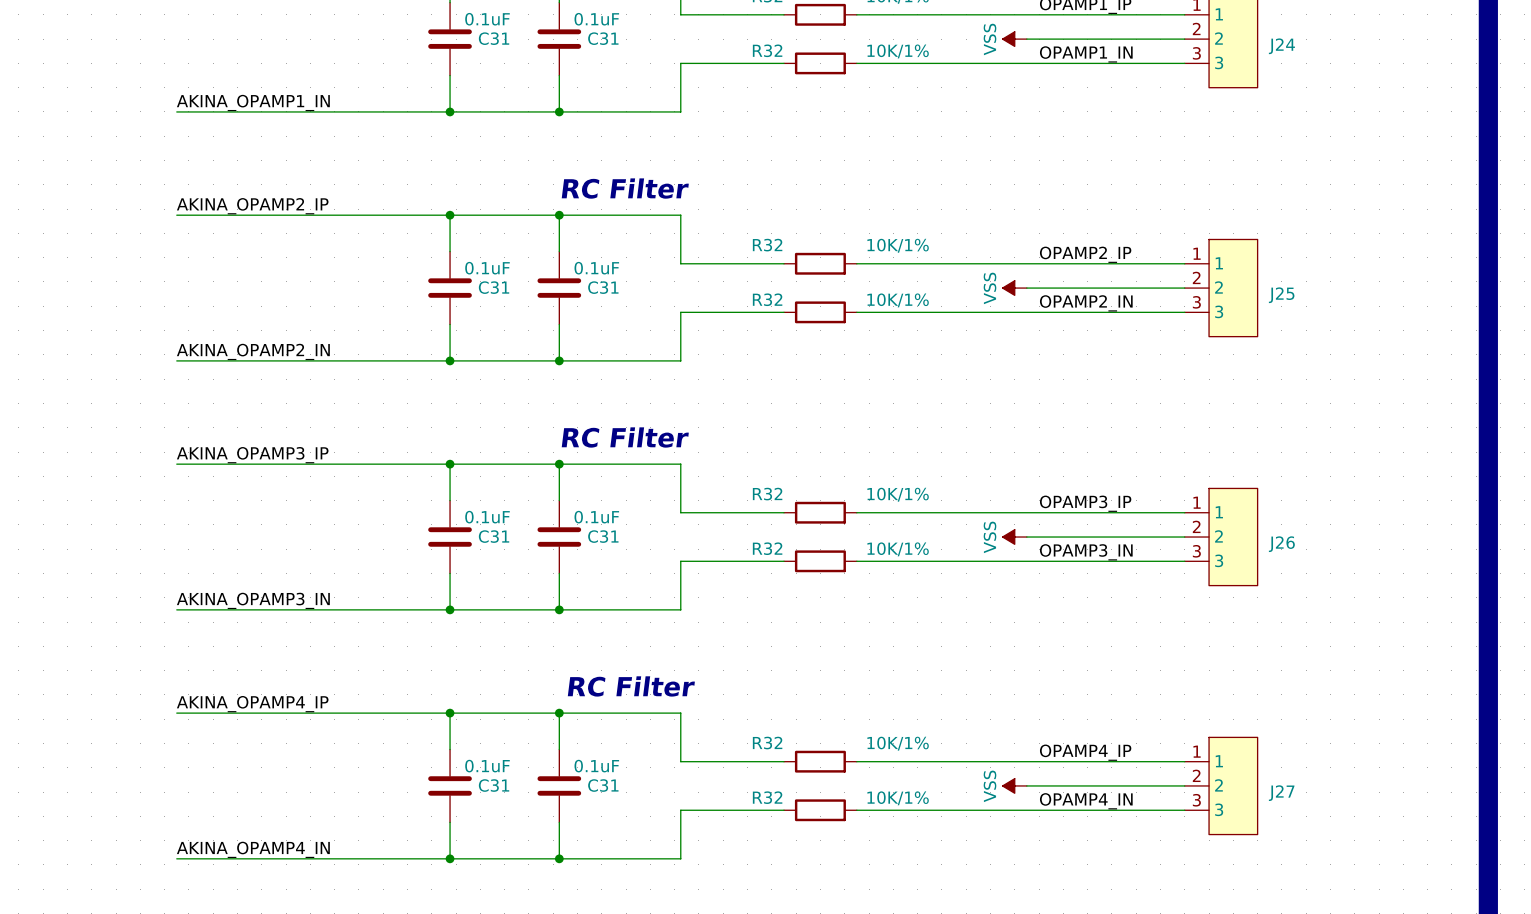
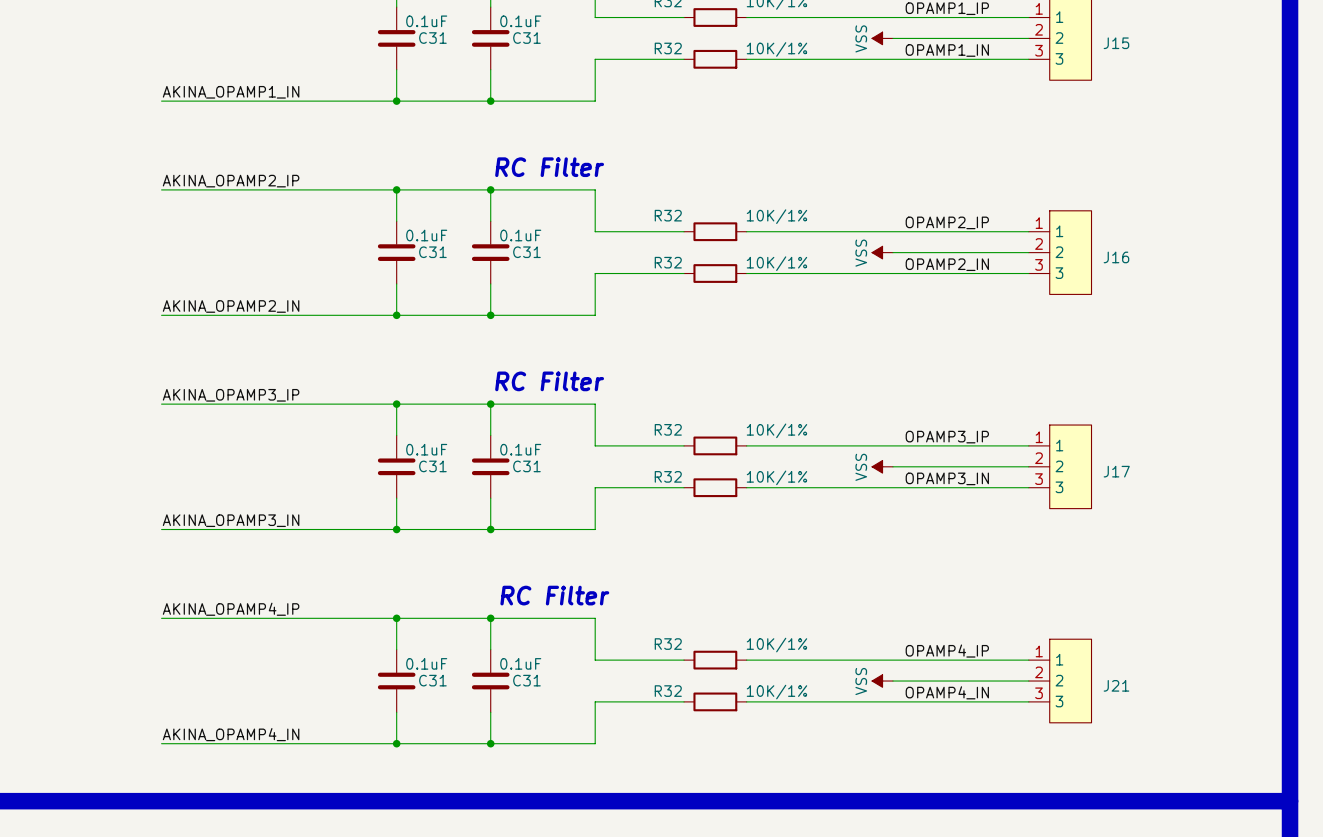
J24 name: J24 (1281, 46) -> J15 (1116, 43)
J25 name: J25 (1281, 295) -> J16 (1116, 257)
J26 name: J26 (1281, 544) -> J17 (1116, 471)
J27 name: J27 (1281, 793) -> J21 (1116, 685)

